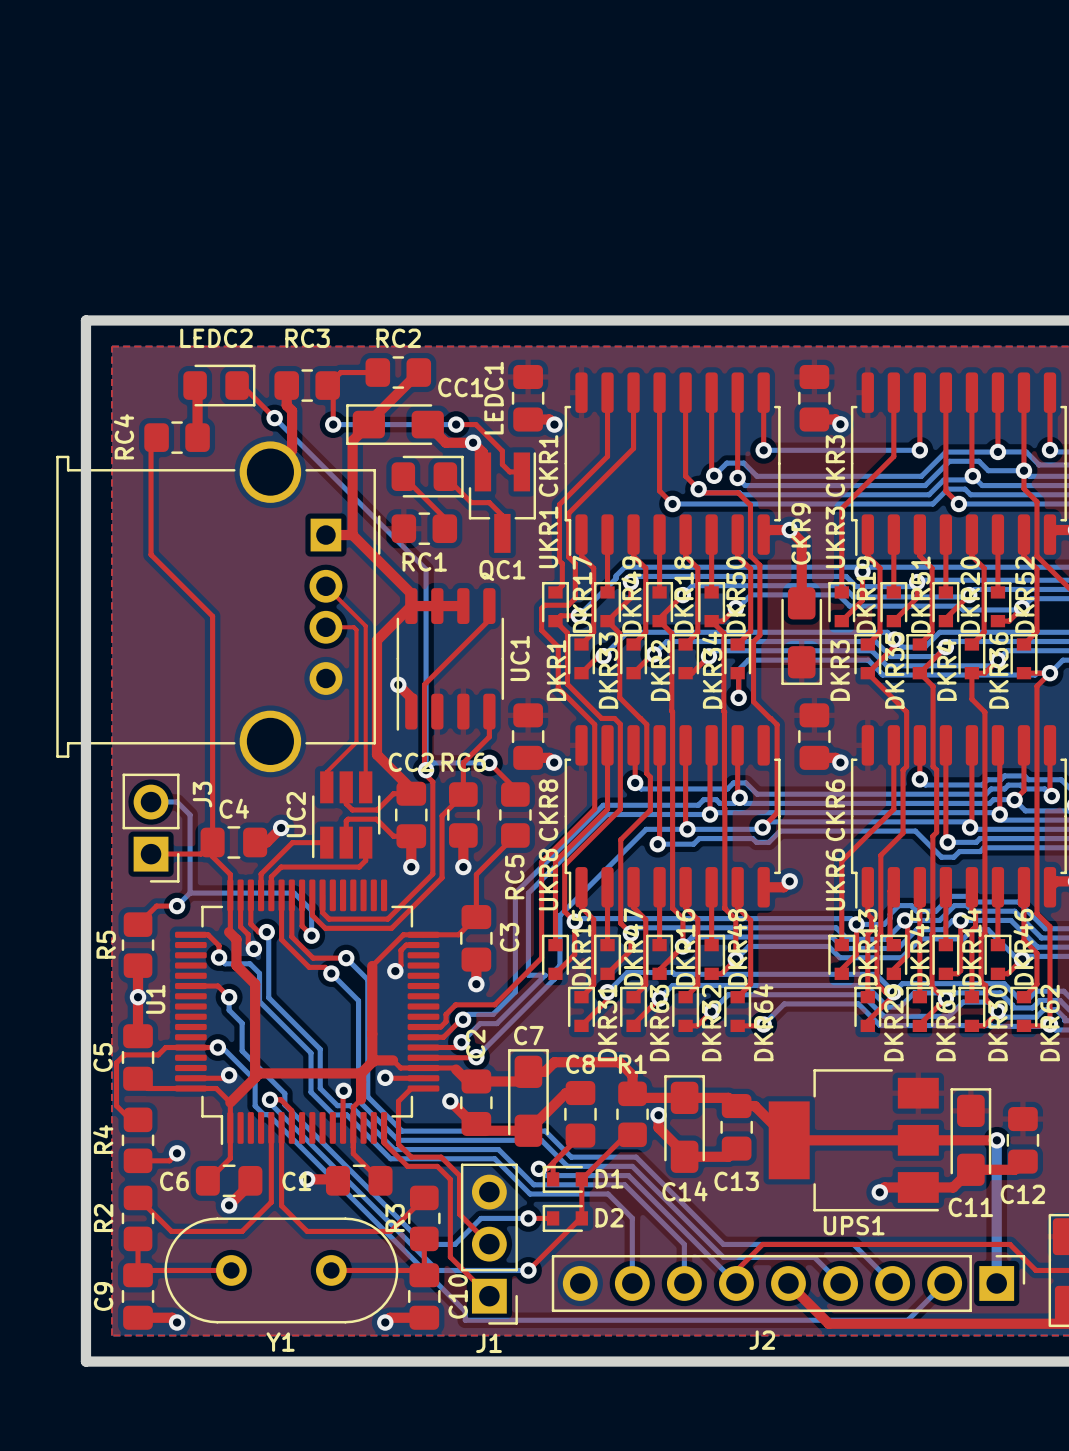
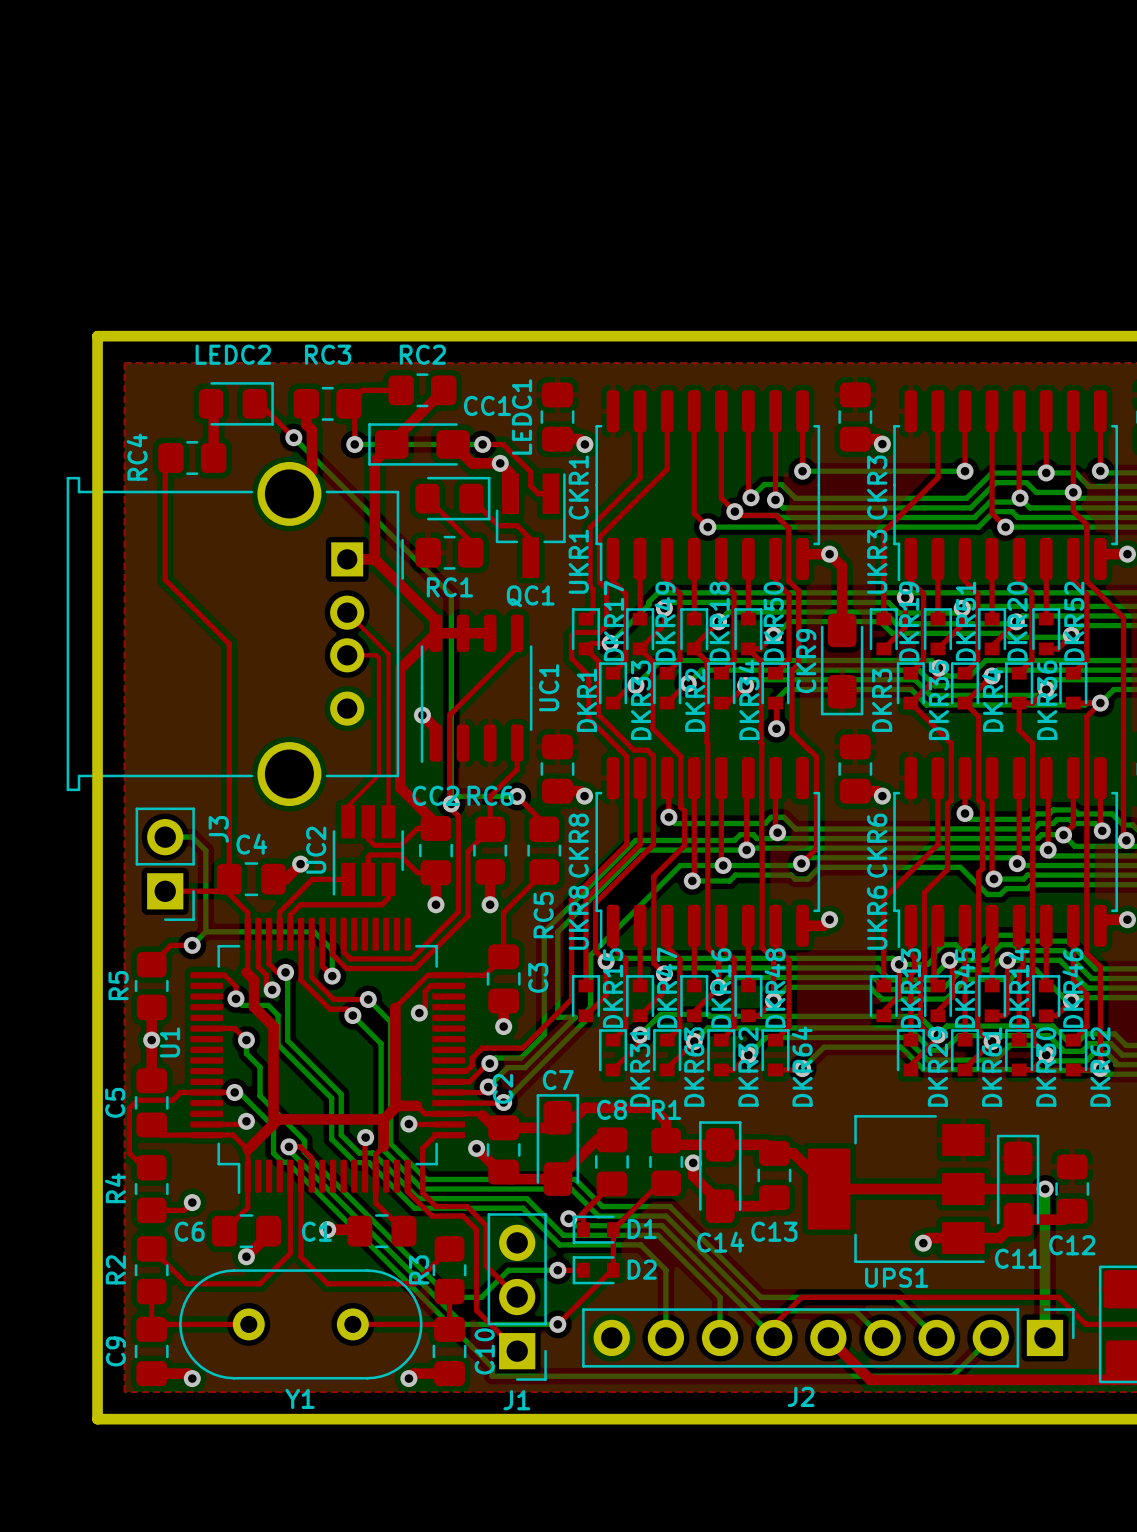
CKR9 name position: CKR9 (801, 533) -> CKR9 (806, 661)

